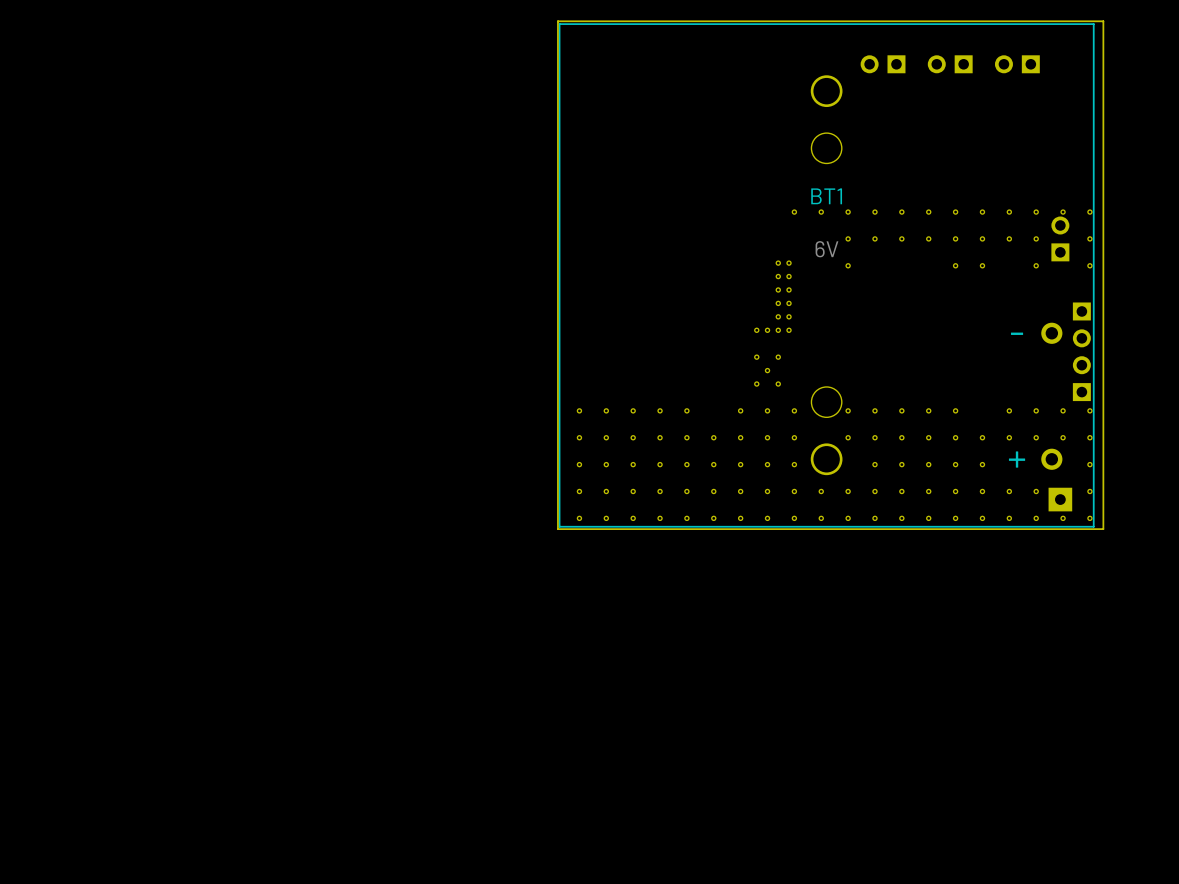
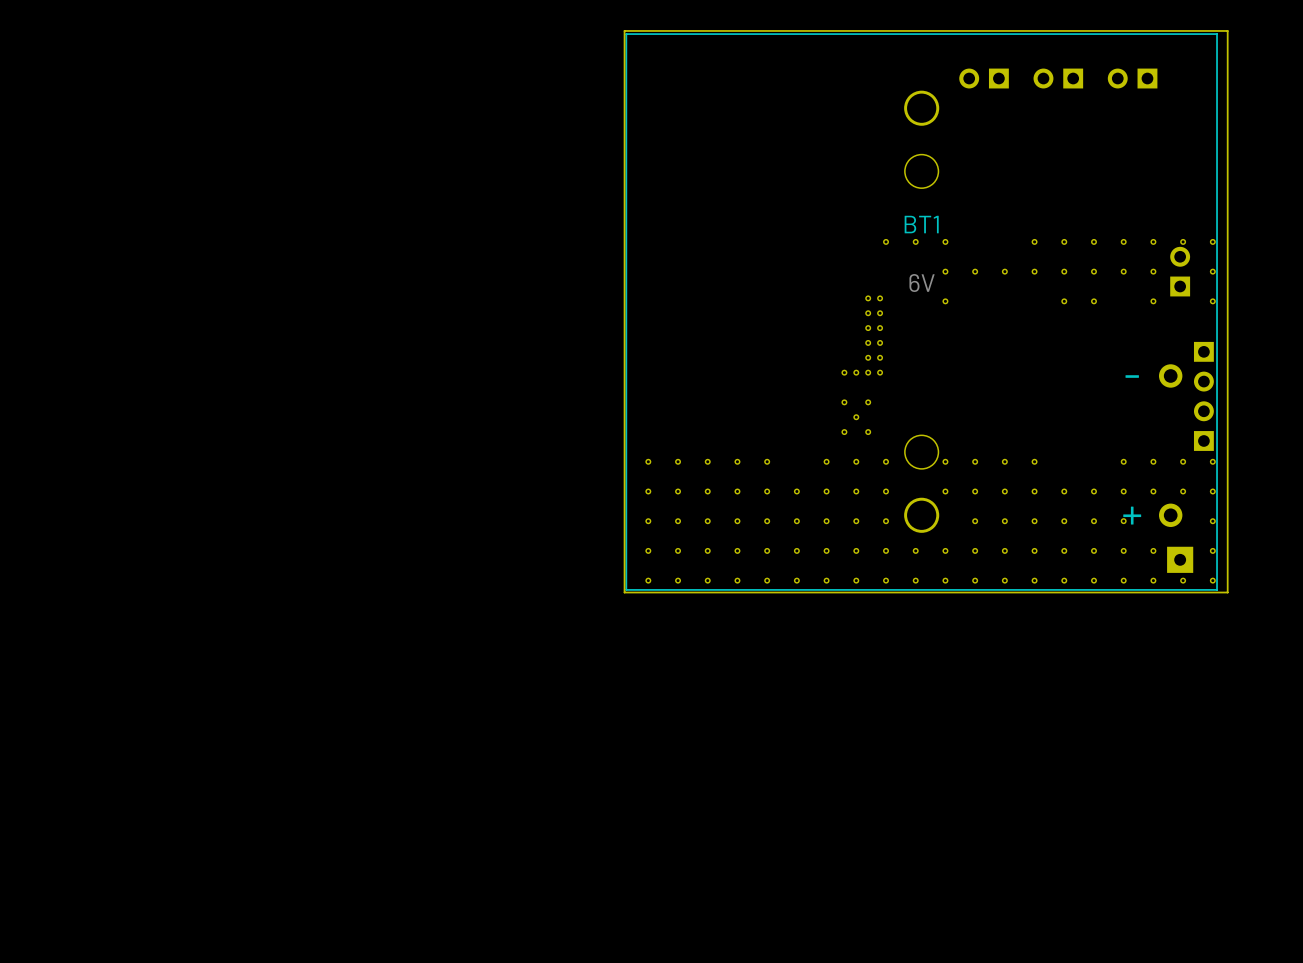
part: (874, 212) -> none
part: (901, 212) -> none
part position: (955, 410) -> (1123, 521)

